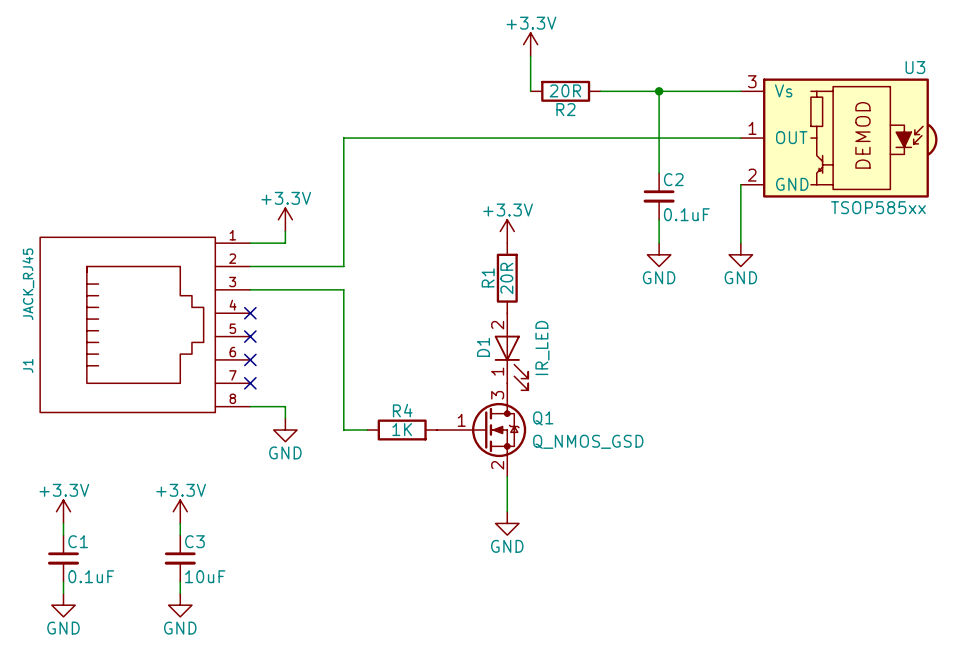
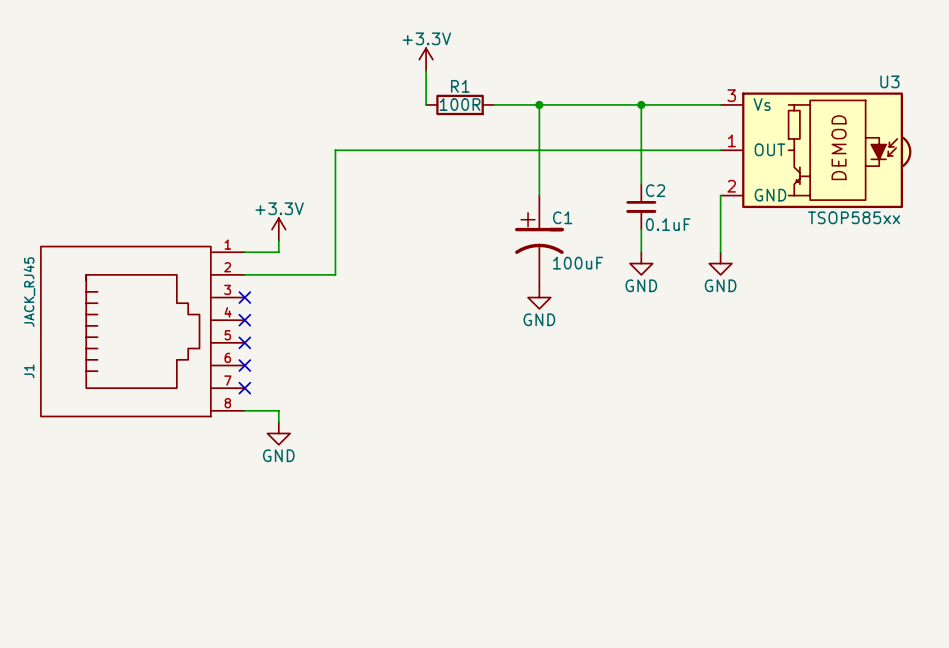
power symbol position: +3.3V (530, 44) -> +3.3V (426, 59)
wire: (530, 56) (530, 91) -> (426, 70) (426, 104)
wire: none -> (494, 104) (584, 104)
wire: none -> (539, 104) (539, 195)
junction: none -> (539, 104)
R2: 20R (565, 91) -> none
power symbol: +3.3V (507, 231) -> none
R1 value: 20R (506, 278) -> 100R (460, 104)
R1 rotation: 0° (507, 278) -> 90° clockwise (460, 104)
R1 position: (507, 278) -> (460, 104)
wire: (250, 289) (343, 289) (343, 430) (367, 430) -> none
no-connect mark: none -> (244, 297)
power symbol: none -> GND (539, 297)
D1: IR_LED (511, 351) -> none
R4: 1K (402, 430) -> none
Q1: Q_NMOS_GSD (481, 430) -> none
wire: (507, 476) (507, 511) -> none
power symbol: +3.3V (63, 511) -> none
power symbol: +3.3V (180, 511) -> none
wire: (63, 523) (63, 535) -> none
wire: (180, 523) (180, 535) -> none
power symbol: GND (507, 523) -> none
C1 symbol: [47, 535, 80, 582] -> [515, 195, 564, 287]
C3: 10uF (180, 558) -> none
C1 value: 0.1uF (91, 576) -> 100uF (578, 263)
wire: (63, 581) (63, 593) -> none
wire: (180, 581) (180, 593) -> none
power symbol: GND (63, 605) -> none
power symbol: GND (180, 605) -> none

